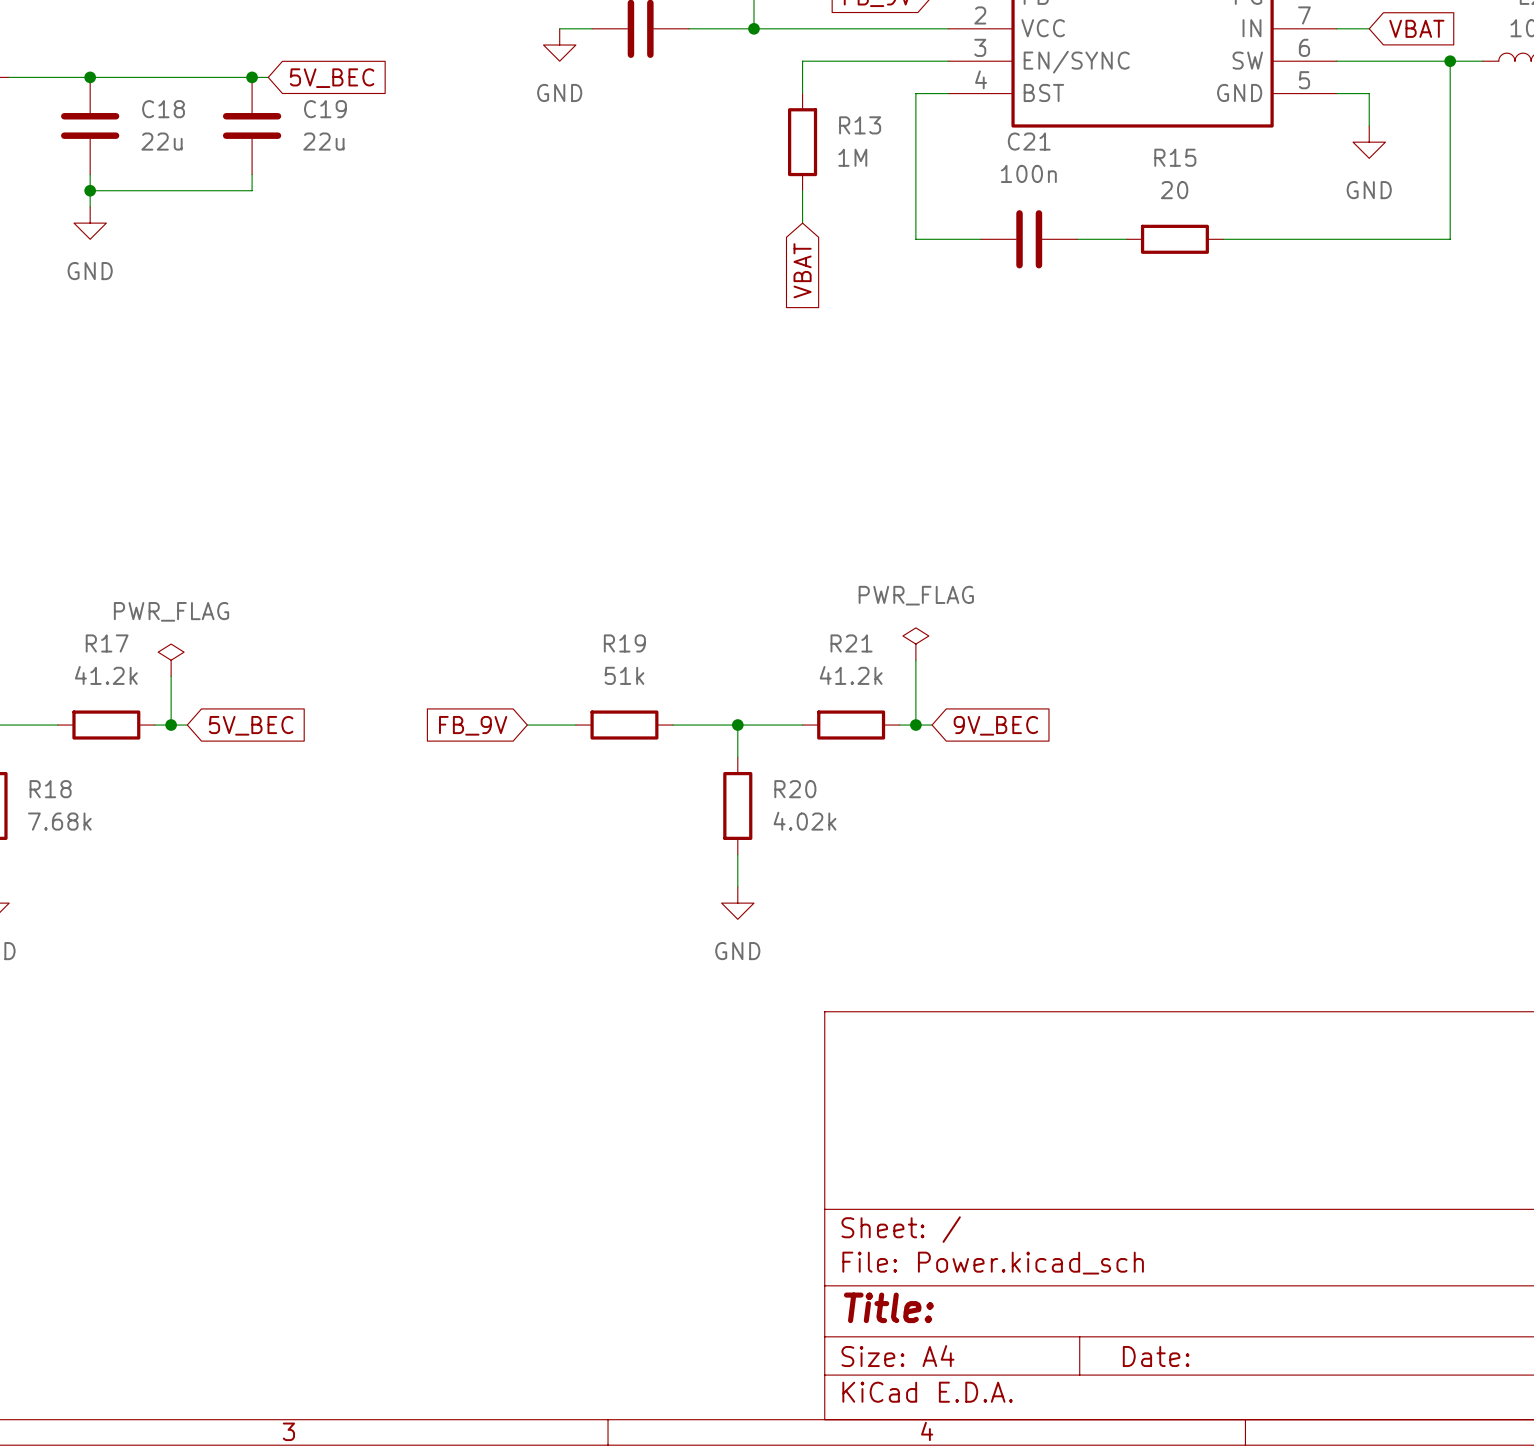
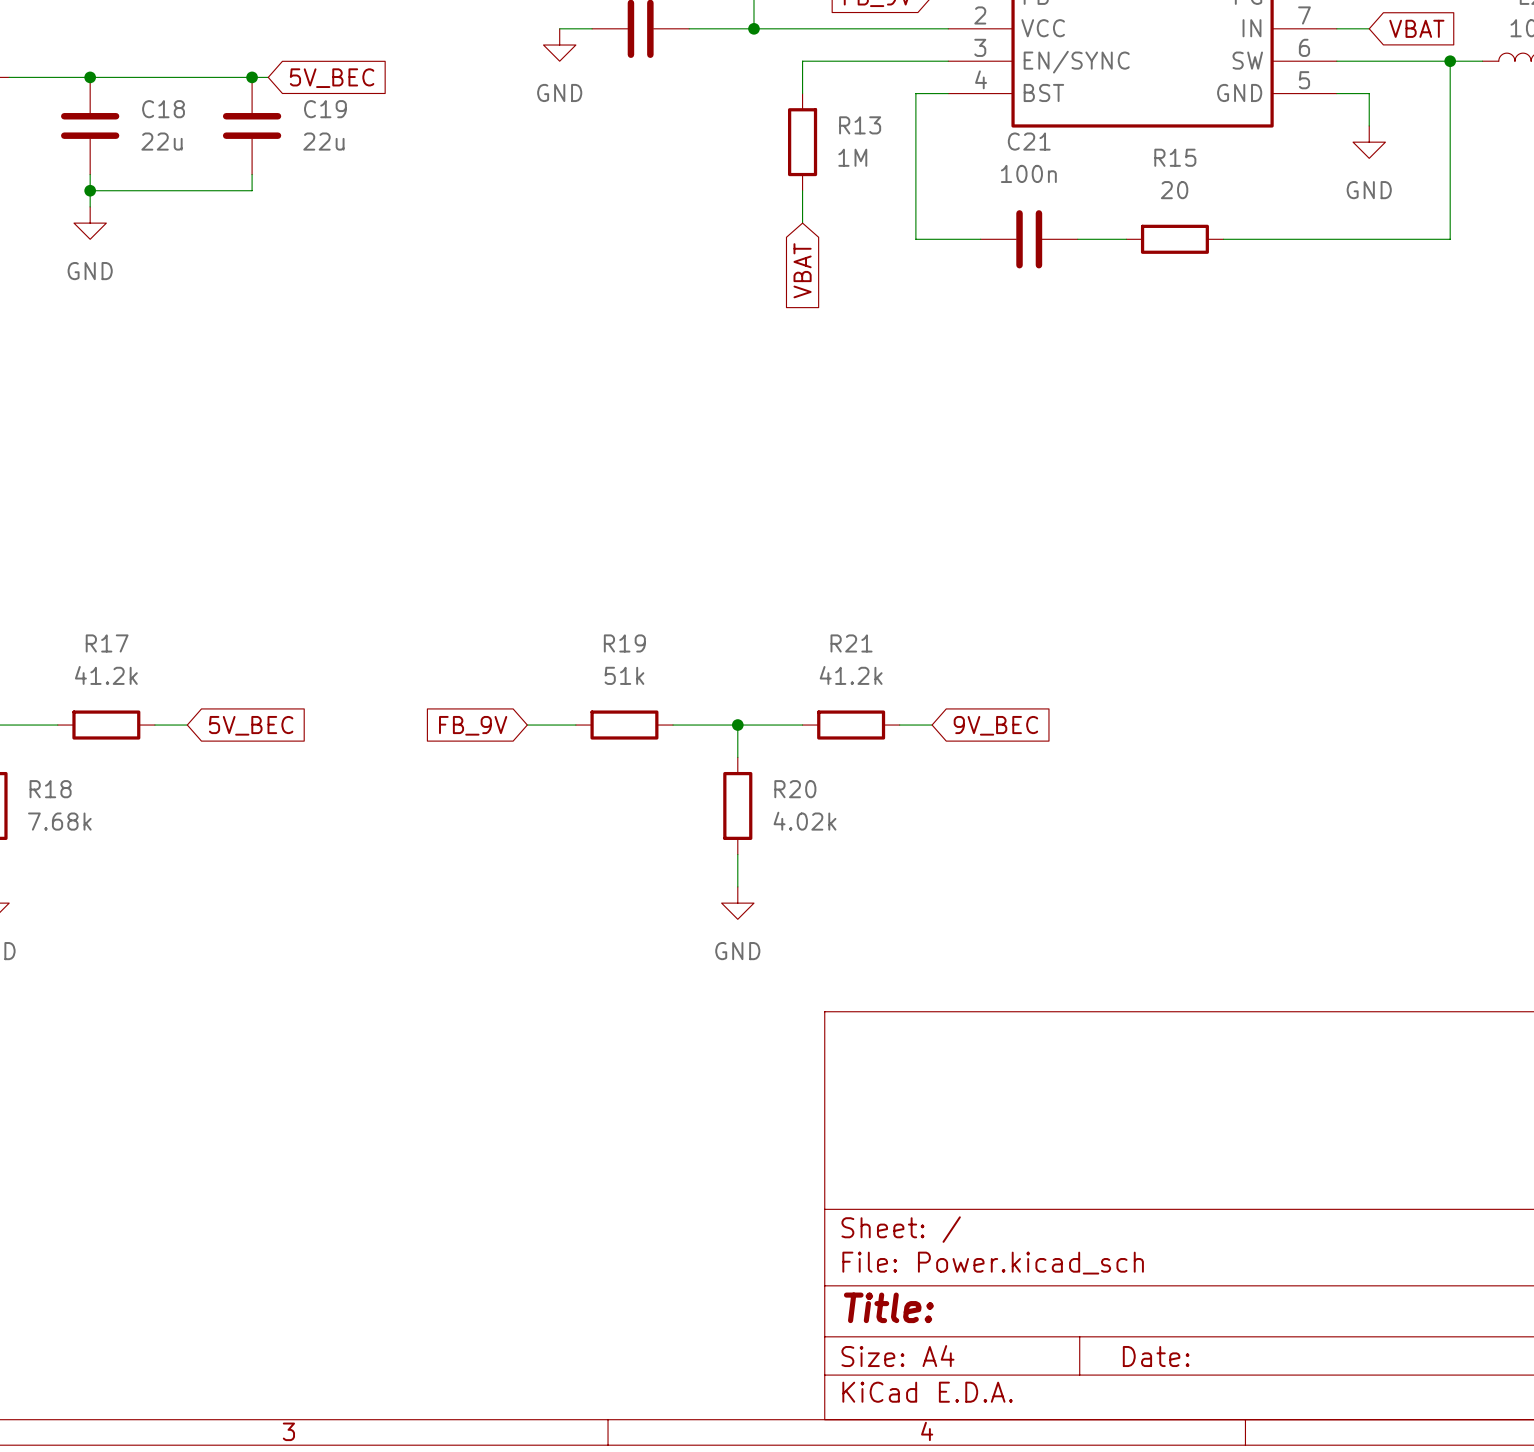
power symbol: PWR_FLAG (915, 644) -> none
power symbol: PWR_FLAG (171, 660) -> none
wire: (915, 660) (915, 725) -> none
wire: (171, 676) (171, 725) -> none
junction: (171, 725) -> none
junction: (915, 725) -> none

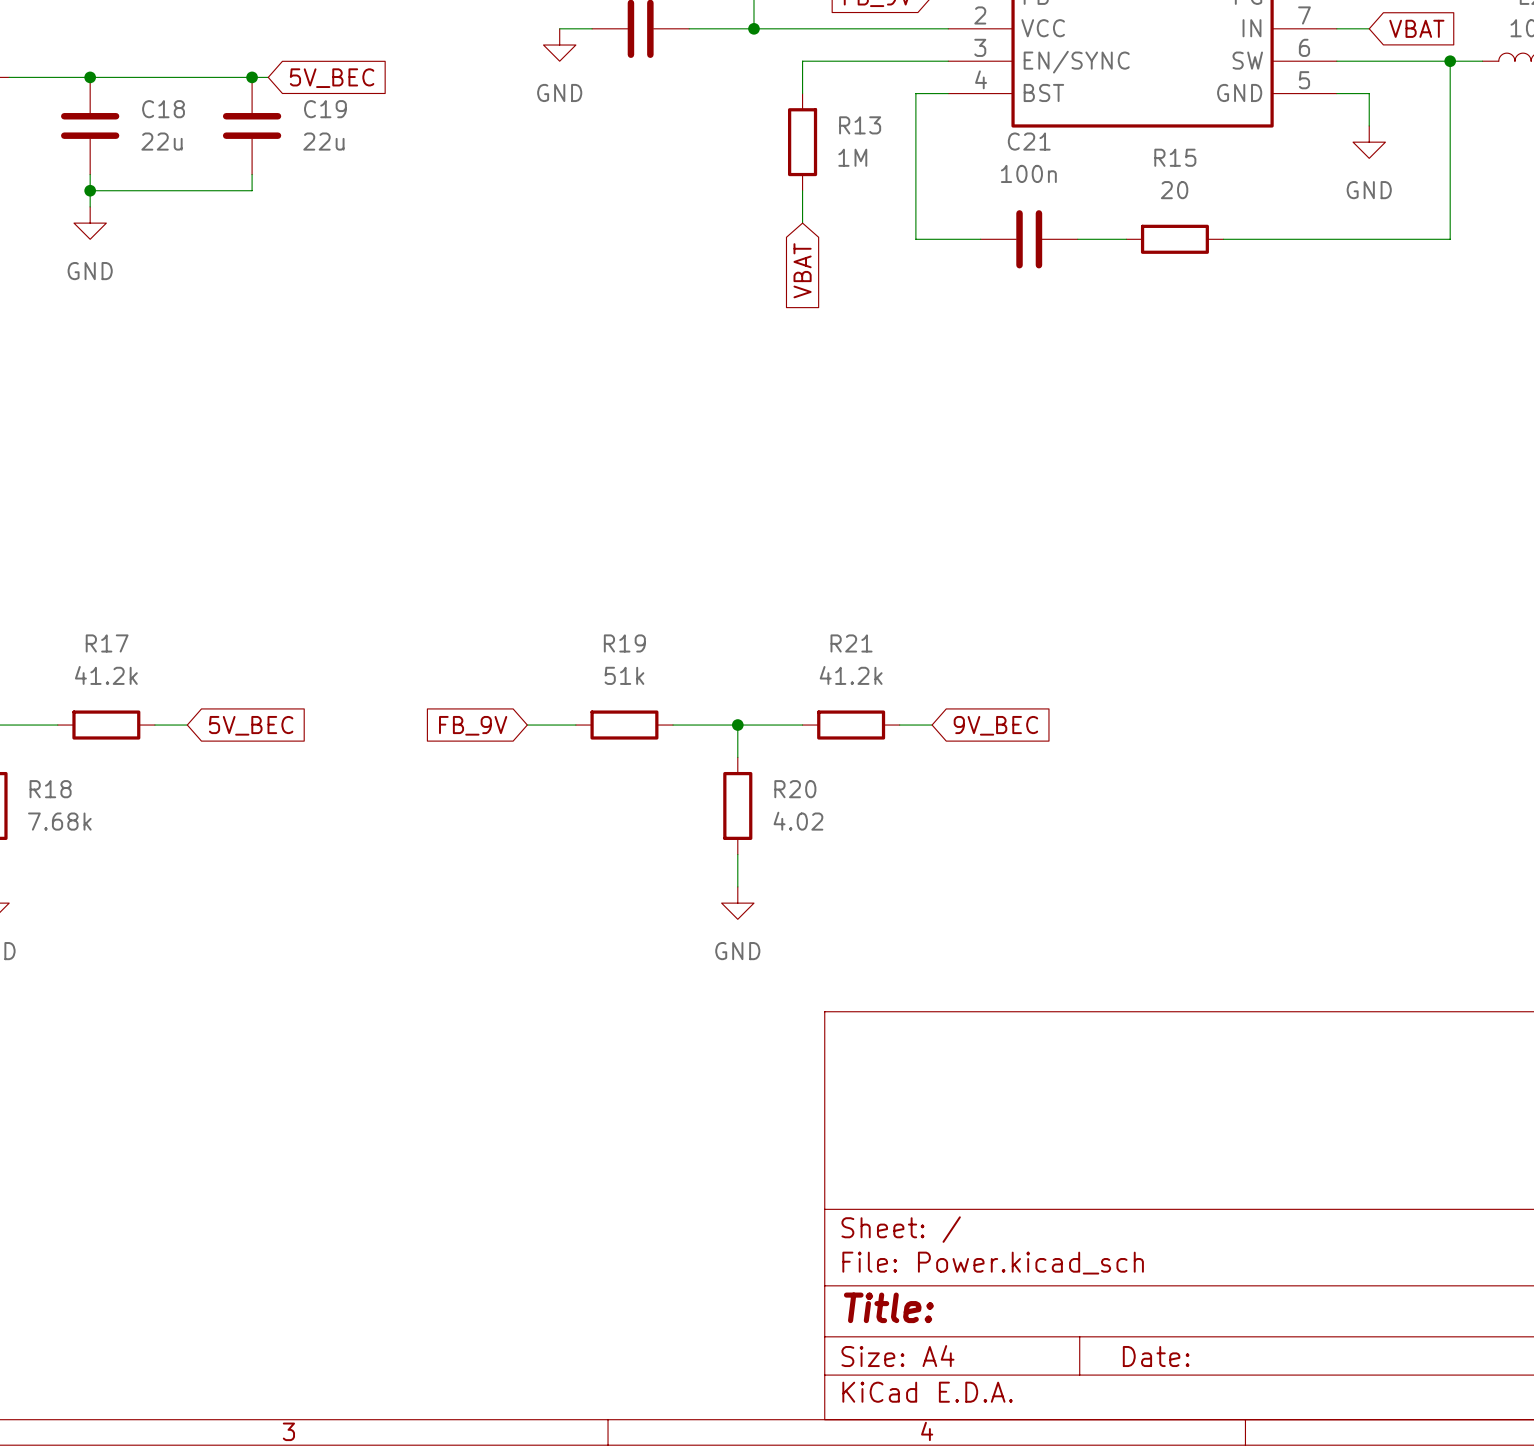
R20 value: 4.02k (805, 821) -> 4.02 (798, 821)

